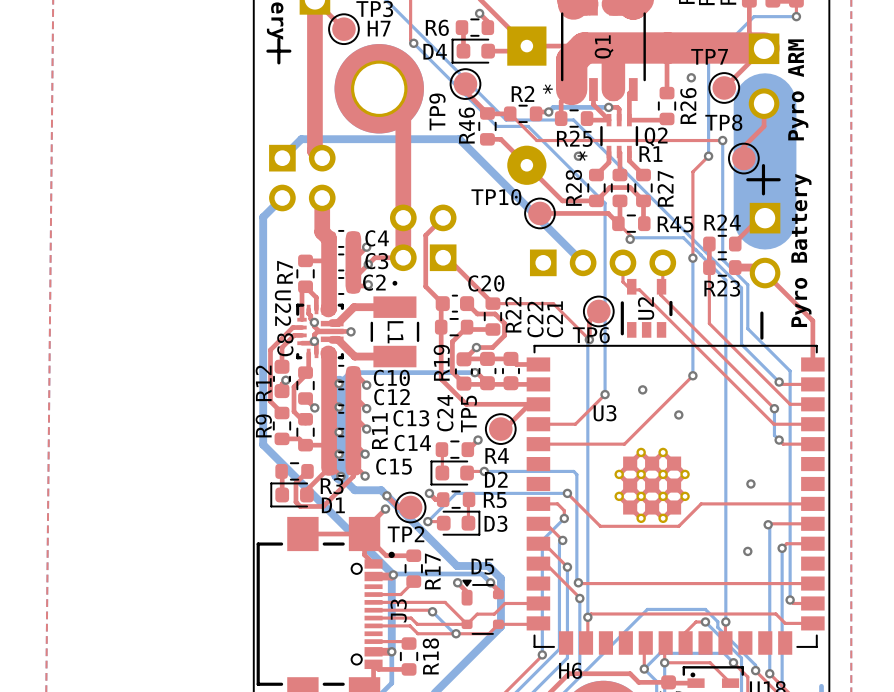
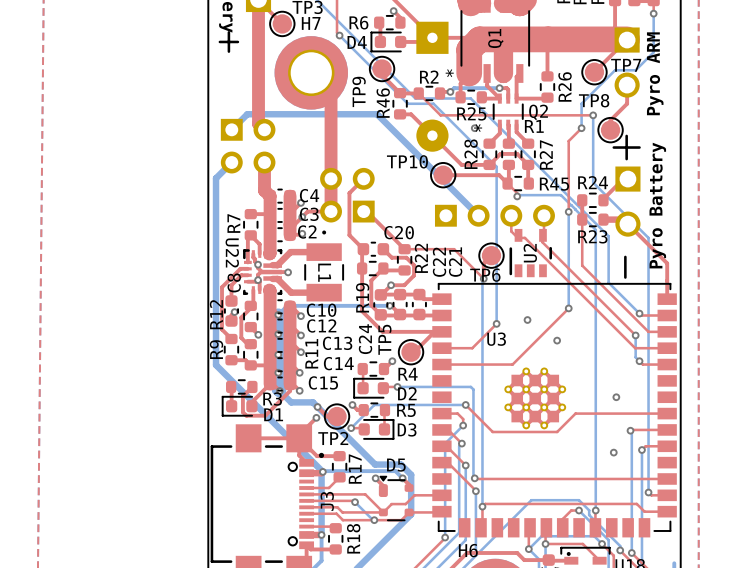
bottom track: (796, 16) (754, 16) (708, 62) (708, 126) -> (653, 13) (653, 52) (635, 70) (615, 70) (581, 103)
TP7 name position: TP7 (709, 56) -> TP7 (626, 65)
via: (691, 77) -> none
bottom track: (765, 104) (765, 218) -> none
bottom track: (722, 222) (722, 259) (747, 284) (747, 328) (790, 371) -> (593, 182) (648, 237) (648, 304)

